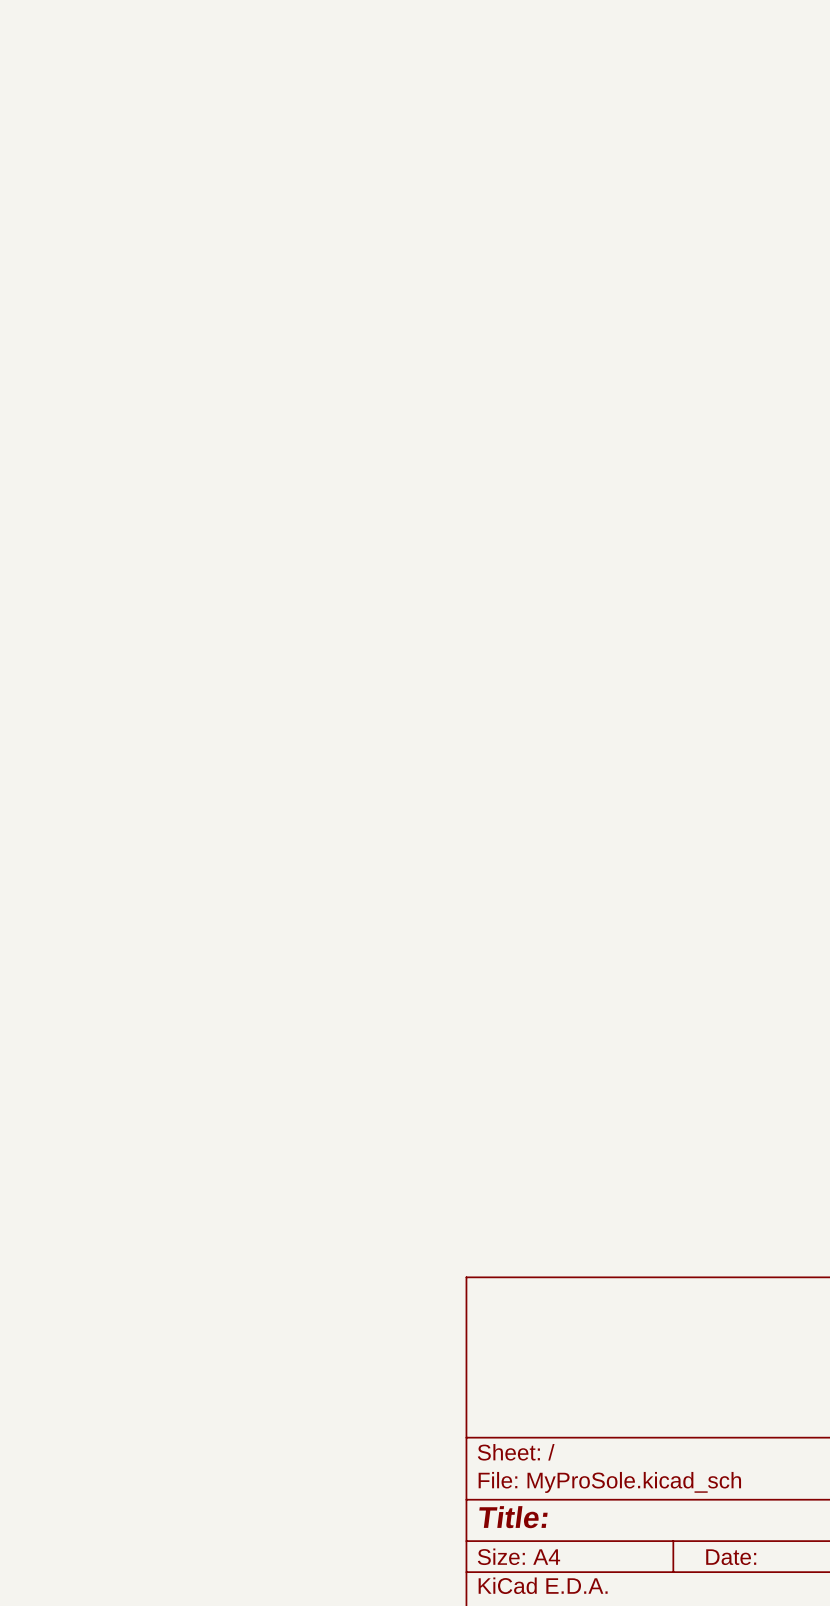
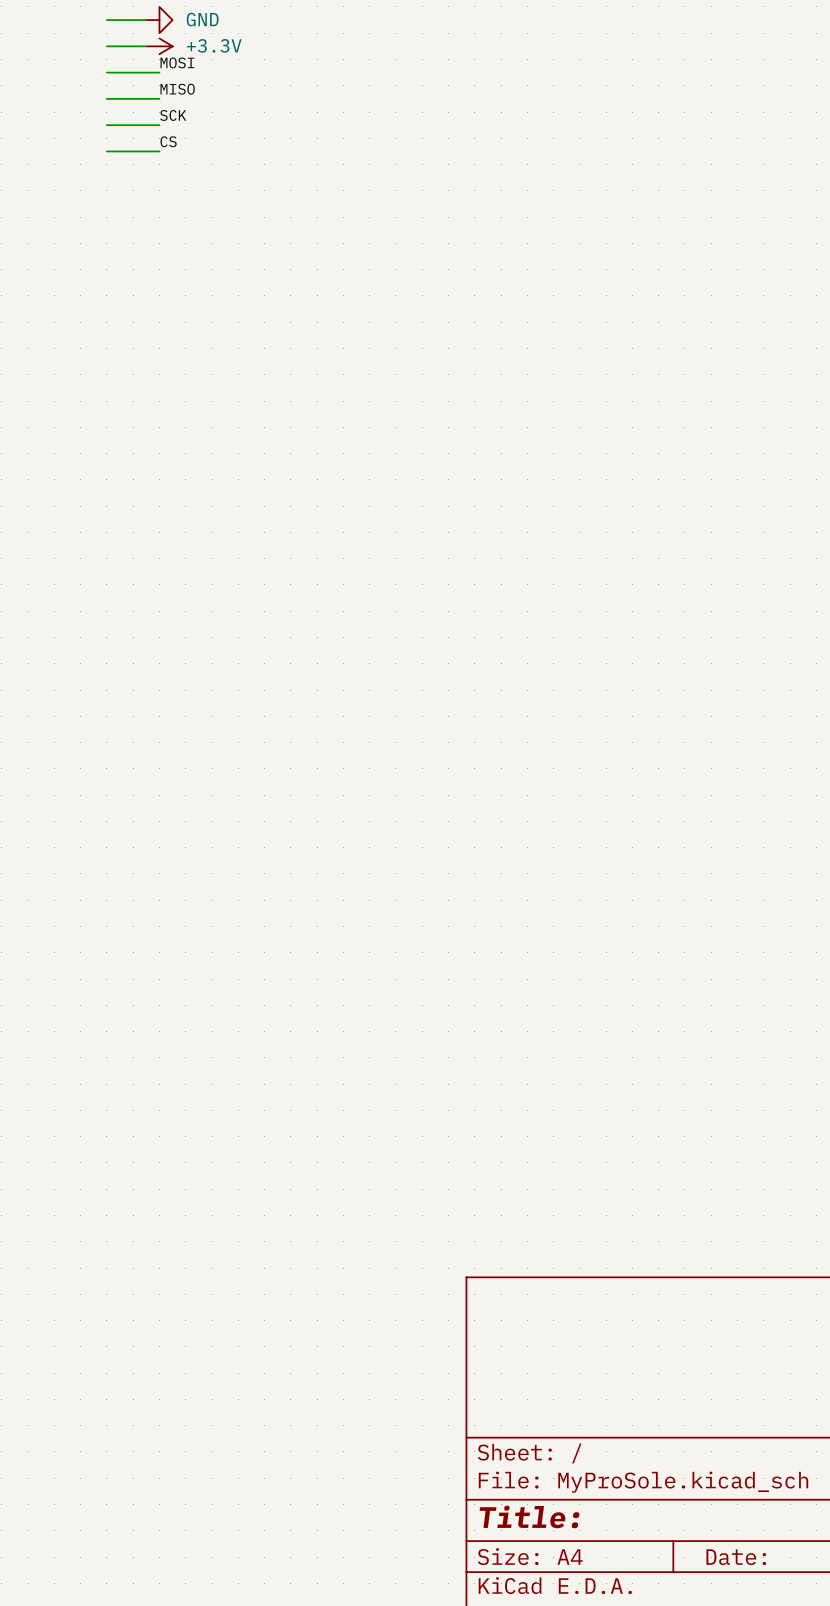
wire: none -> (106, 20) (146, 20)
power symbol: none -> GND (159, 20)
wire: none -> (106, 46) (146, 46)
power symbol: none -> +3.3V (159, 46)
label: none -> MOSI (177, 62)
wire: none -> (106, 72) (159, 72)
label: none -> MISO (177, 89)
wire: none -> (106, 98) (159, 98)
label: none -> SCK (173, 115)
wire: none -> (106, 125) (159, 125)
label: none -> CS (168, 141)
wire: none -> (106, 151) (159, 151)

